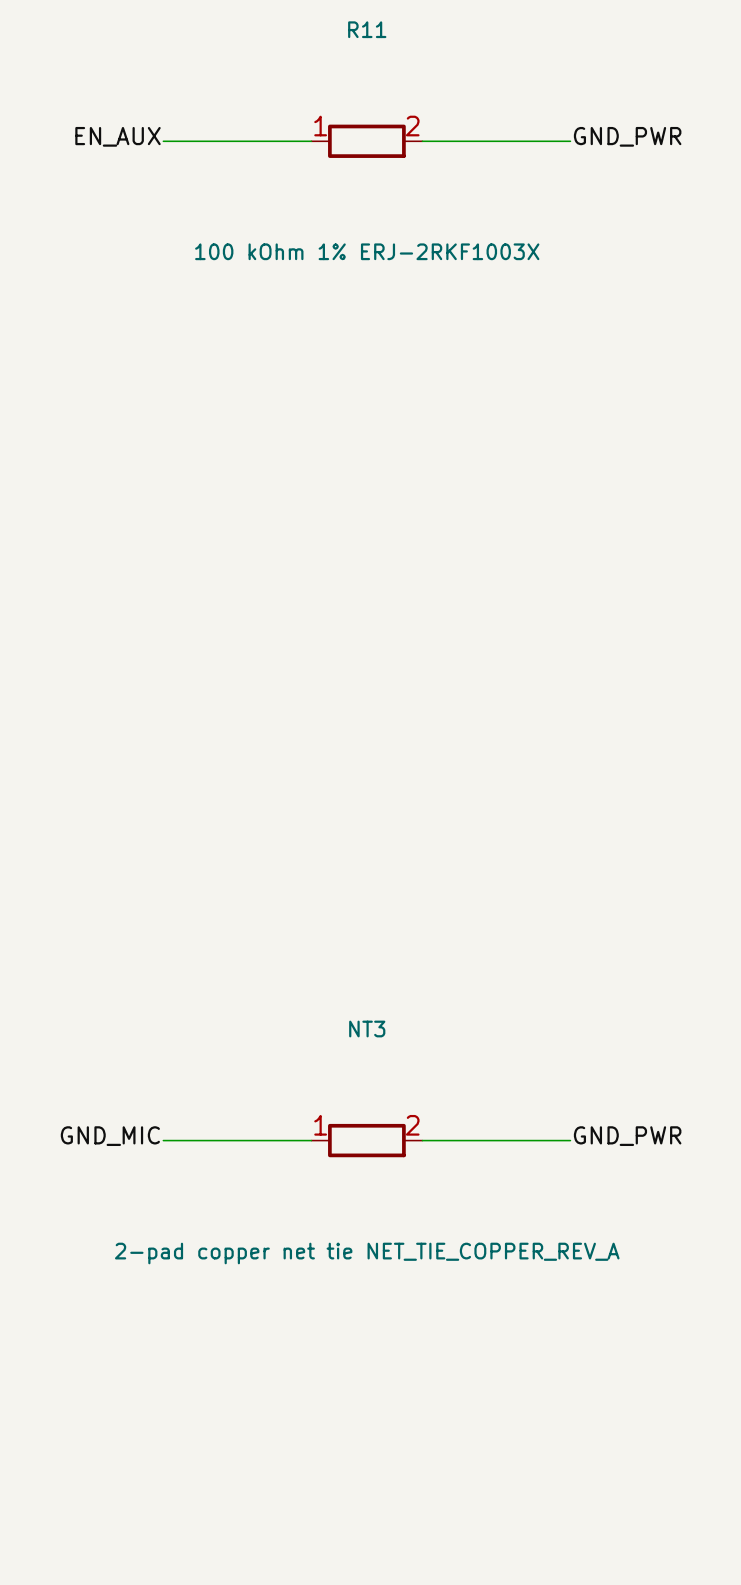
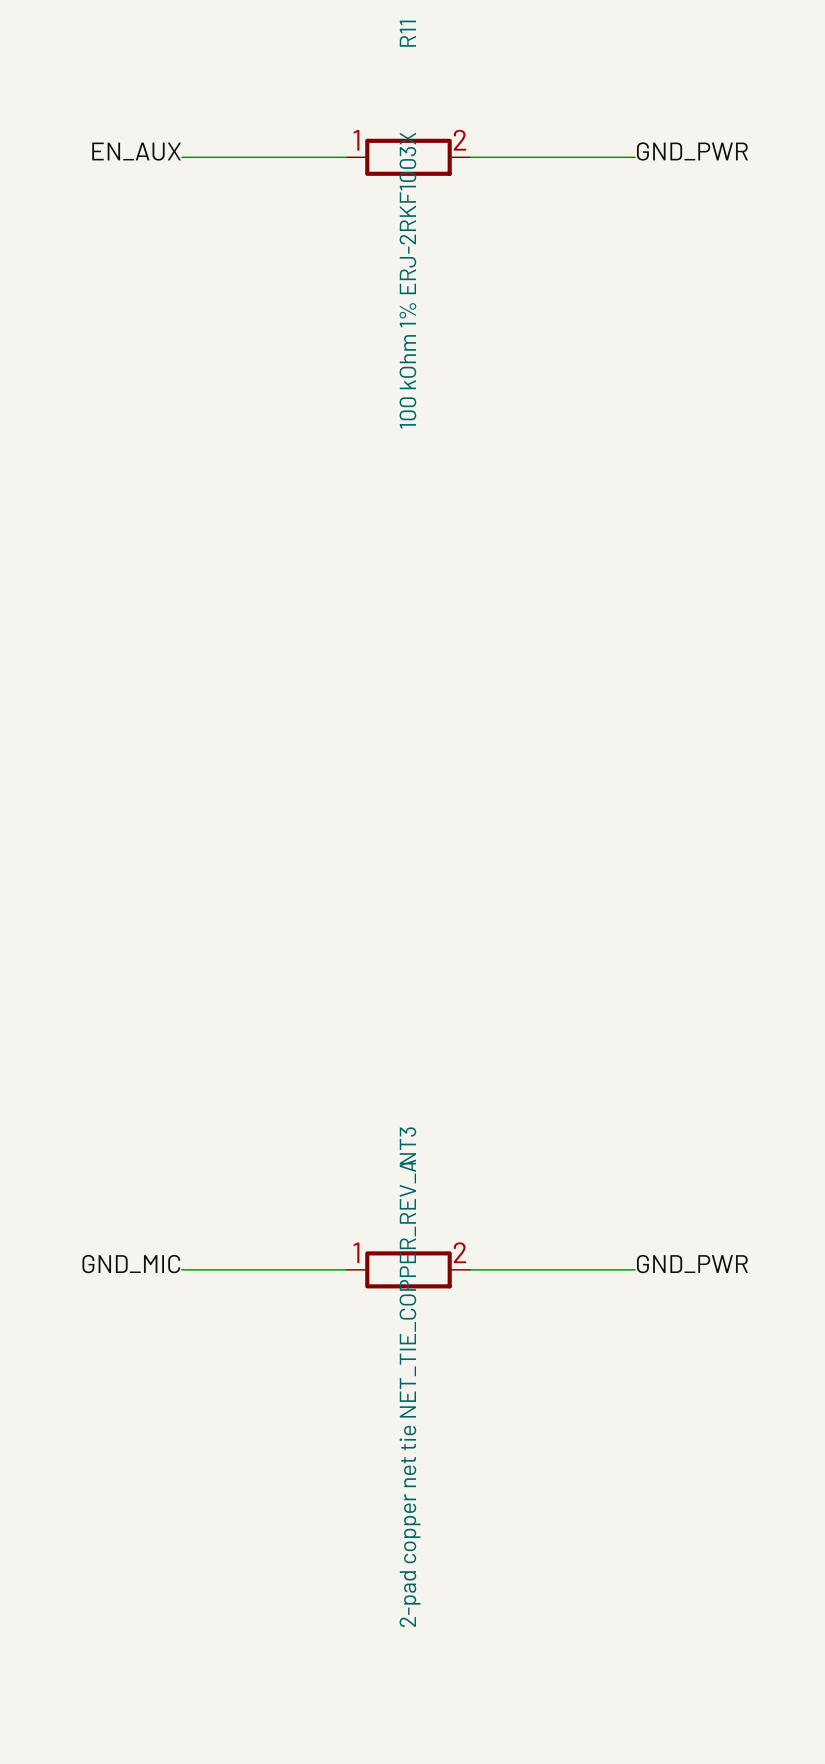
R11 name rotation: 0° (367, 29) -> 90° counterclockwise (407, 33)
R11 value rotation: 0° (367, 251) -> 90° counterclockwise (407, 280)
NT3 name rotation: 0° (367, 1029) -> 90° counterclockwise (407, 1145)
NT3 value rotation: 0° (367, 1253) -> 90° counterclockwise (410, 1393)

